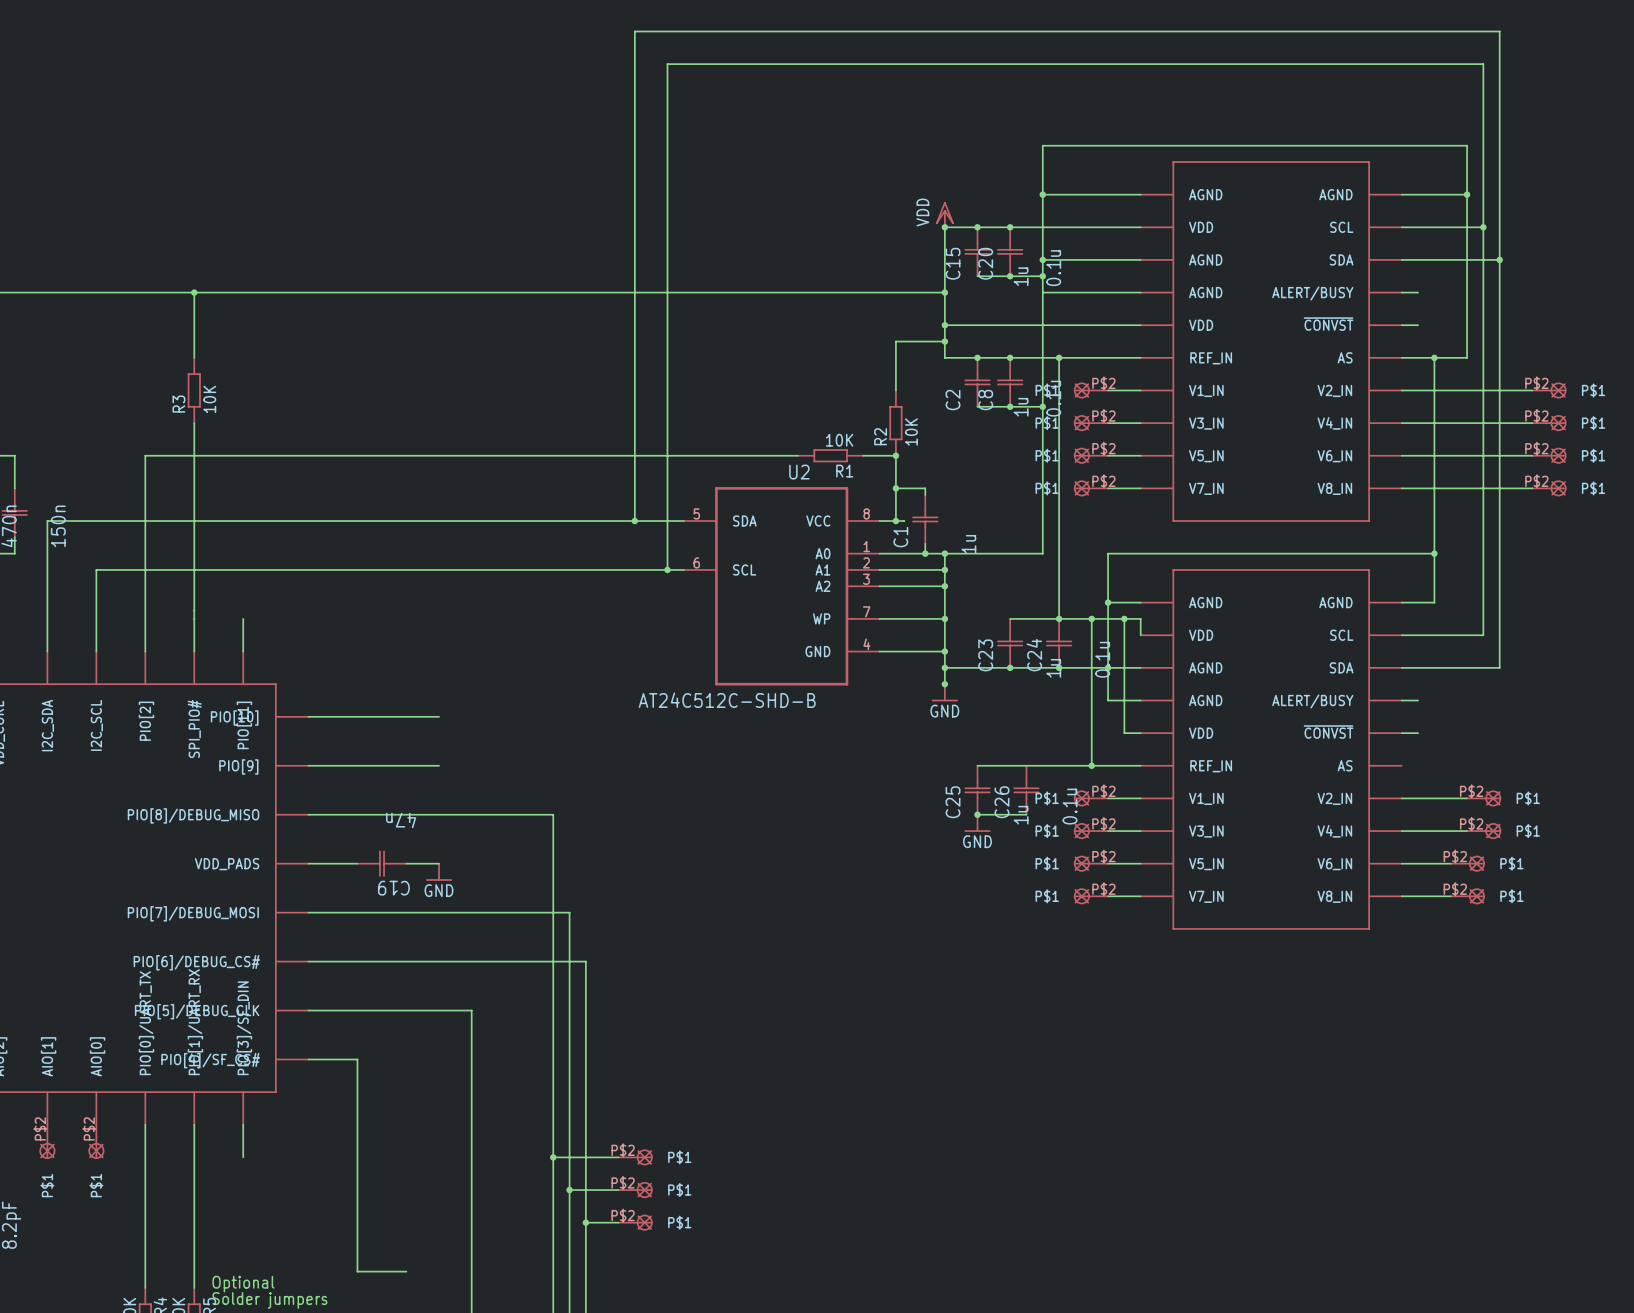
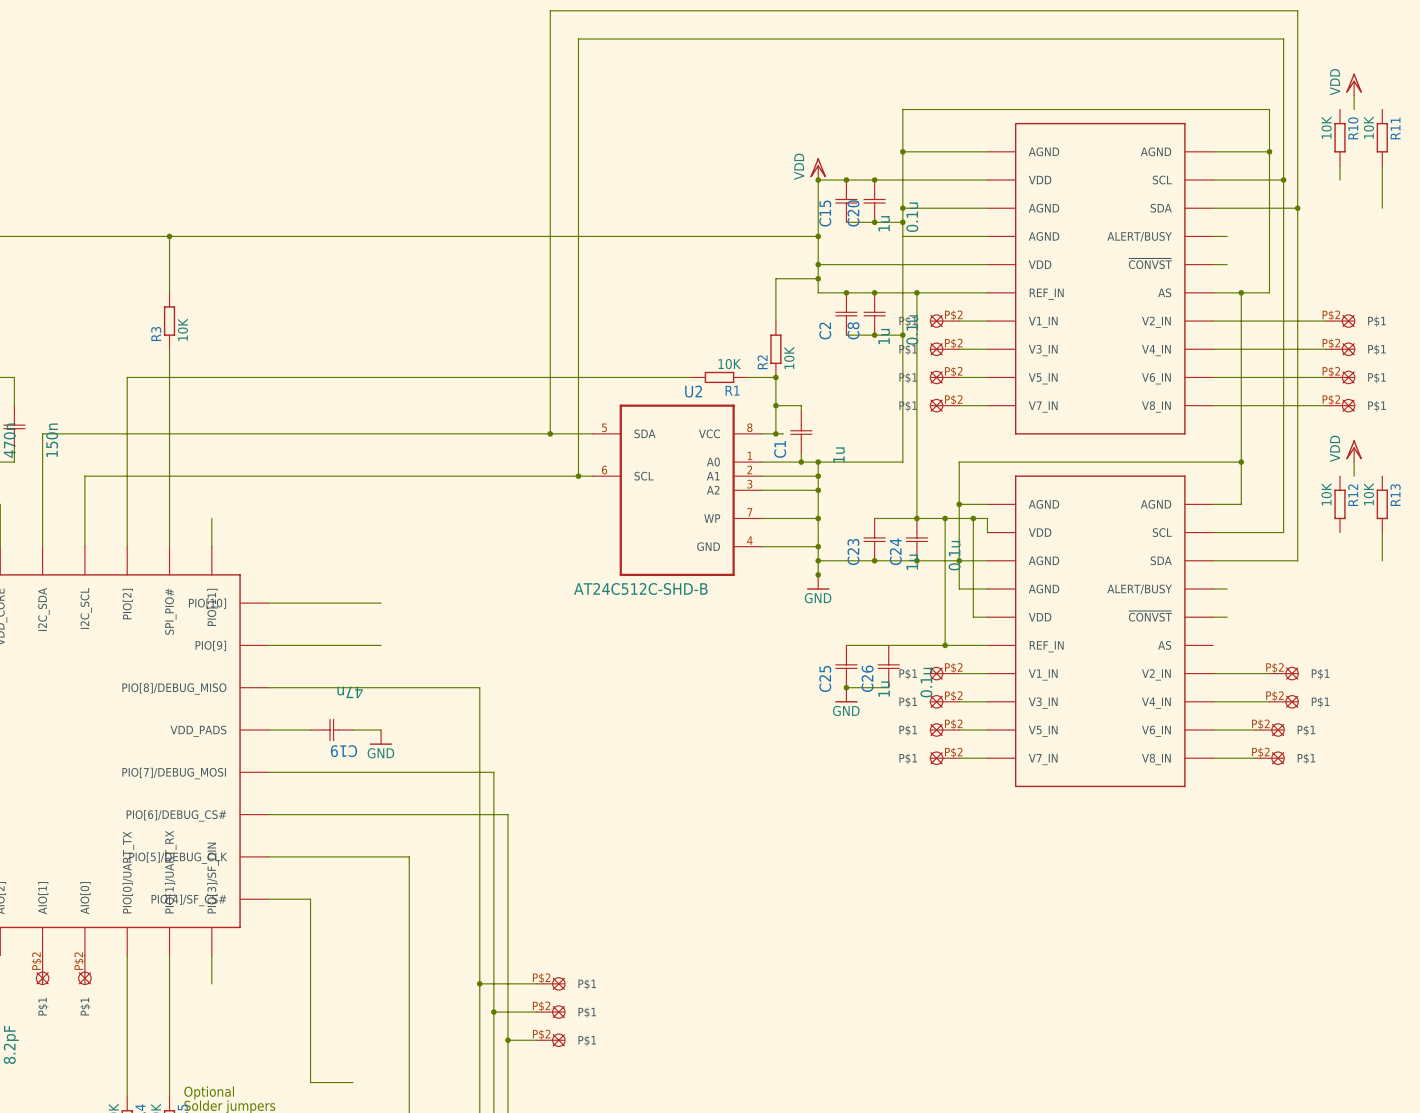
power symbol: none -> VDD (1354, 84)
wire: none -> (1354, 95) (1354, 109)
R10: none -> 10K (1340, 137)
R11: none -> 10K (1382, 137)
wire: none -> (1340, 165) (1340, 180)
wire: none -> (1382, 165) (1382, 208)
power symbol: none -> VDD (1354, 451)
wire: none -> (1354, 462) (1354, 476)
R12: none -> 10K (1340, 504)
R13: none -> 10K (1382, 504)
wire: none -> (1382, 532) (1382, 560)

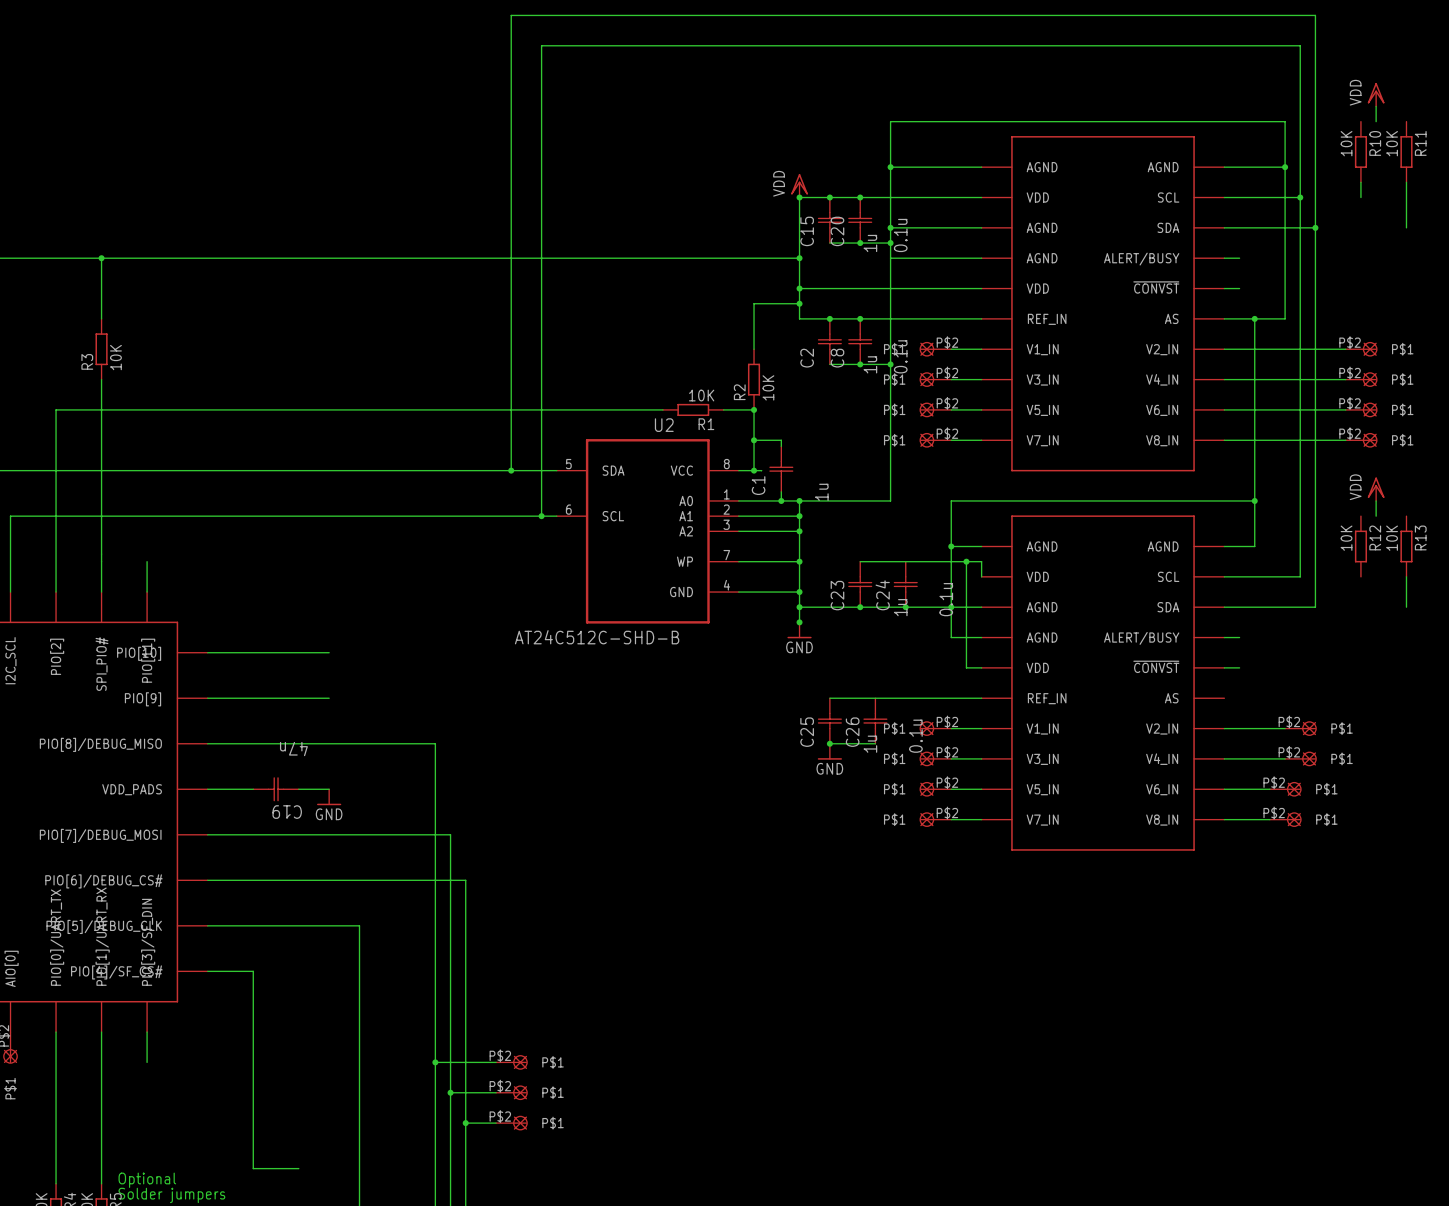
wire: (916, 292) (916, 518) -> none
junction: (916, 292) -> none
junction: (916, 518) -> none
wire: (945, 518) (945, 645) -> none
junction: (945, 518) -> none
junction: (945, 645) -> none

